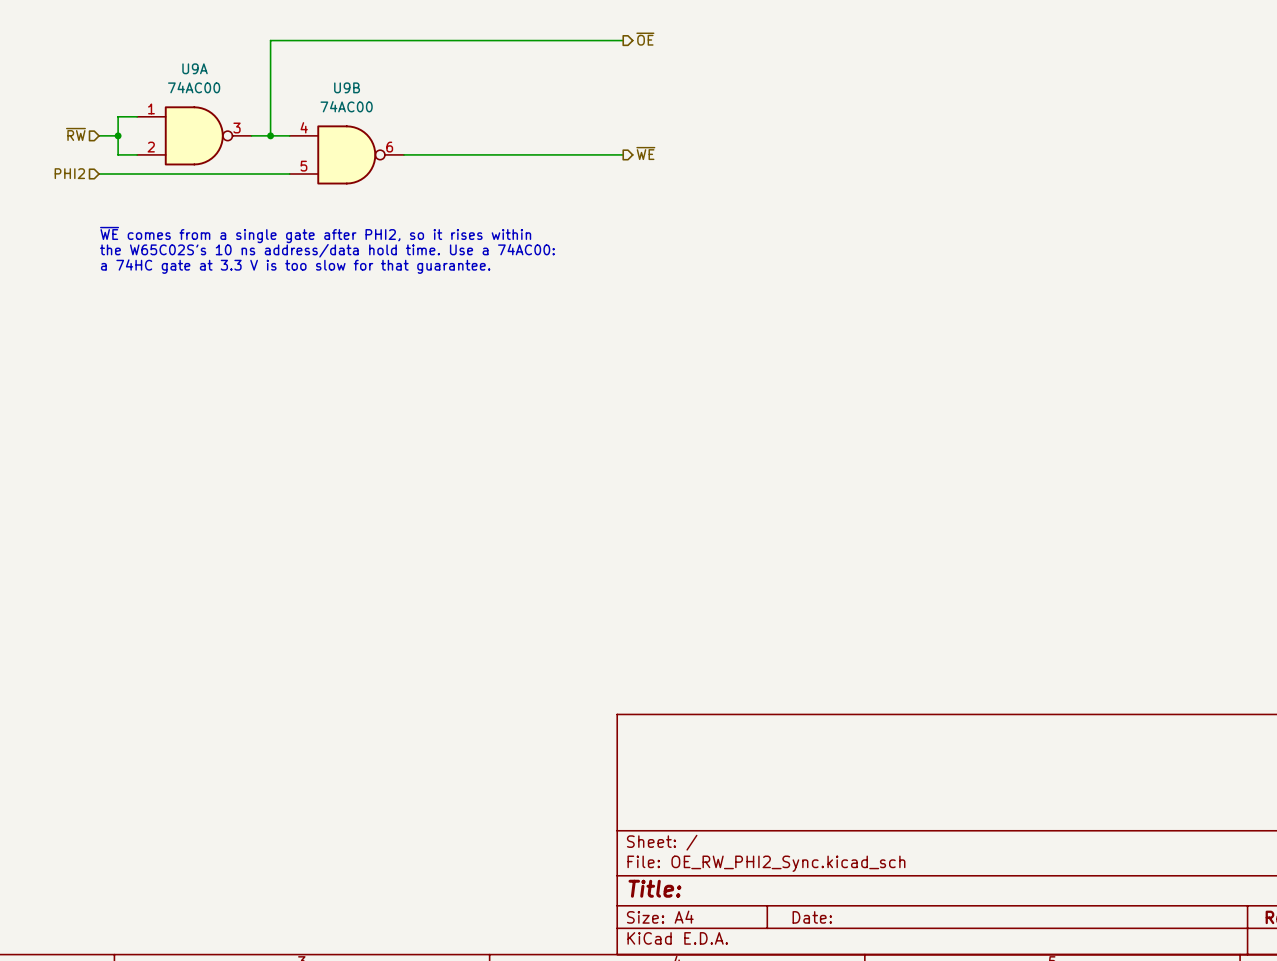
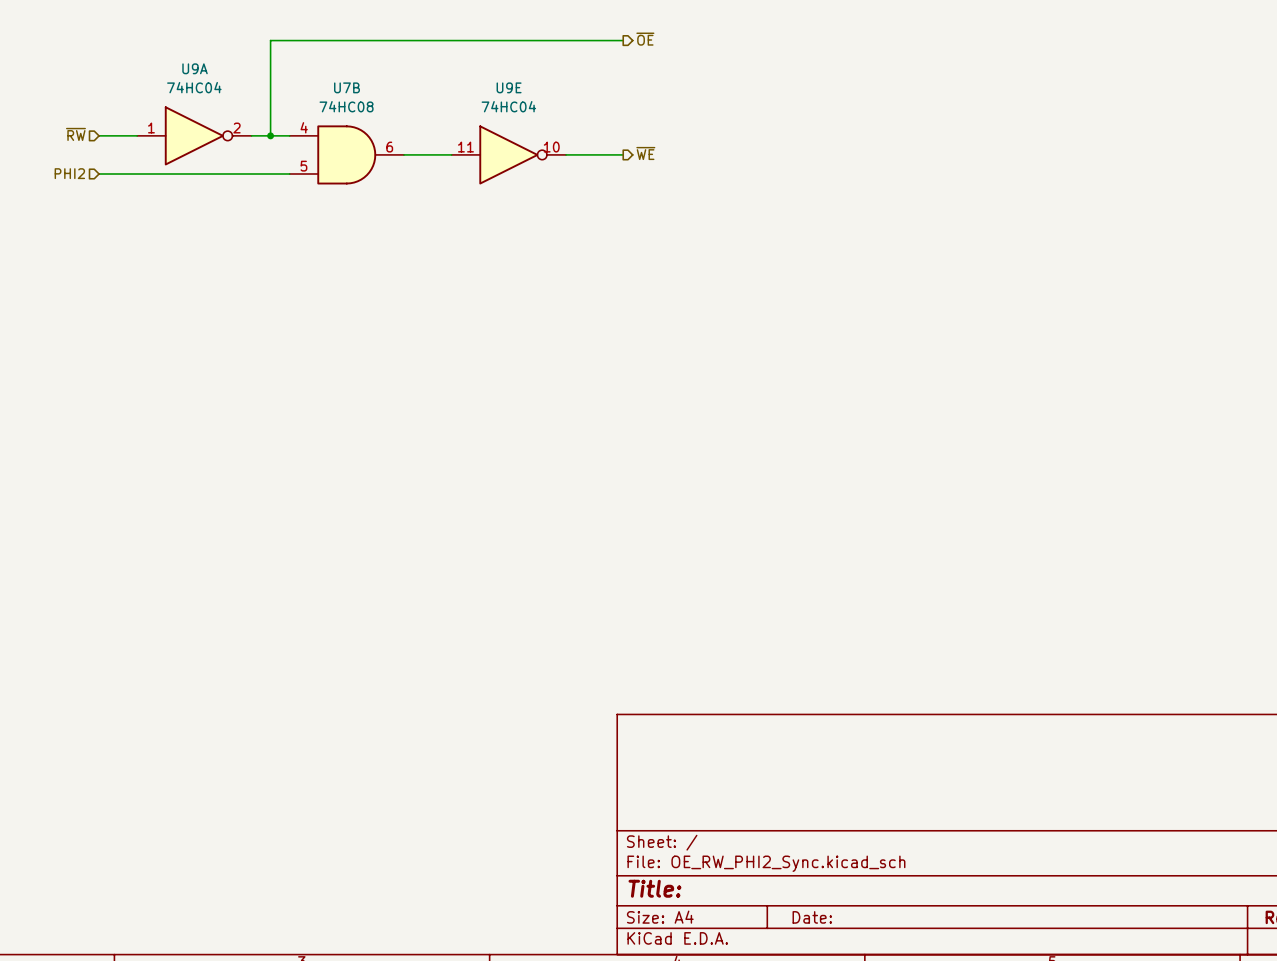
U9A value: 74AC00 (194, 87) -> 74HC04 (194, 87)
U9A symbol: [137, 106, 252, 166] -> [137, 106, 252, 166]
wire: (137, 116) (118, 116) (118, 154) (137, 154) -> none
wire: none -> (118, 135) (137, 135)
junction: (118, 135) -> none
U9B: 74AC00 (346, 154) -> none
U7B: none -> 74HC08 (346, 154)
U9E: none -> 74HC04 (508, 154)
text: ~{WE} comes from a single gate after PHI2, so it rises within (315, 235) -> none
text: the W65C02S's 10 ns address/data hold time. Use a 74AC00: (327, 250) -> none
text: a 74HC gate at 3.3 V is too slow for that guarantee. (295, 266) -> none

